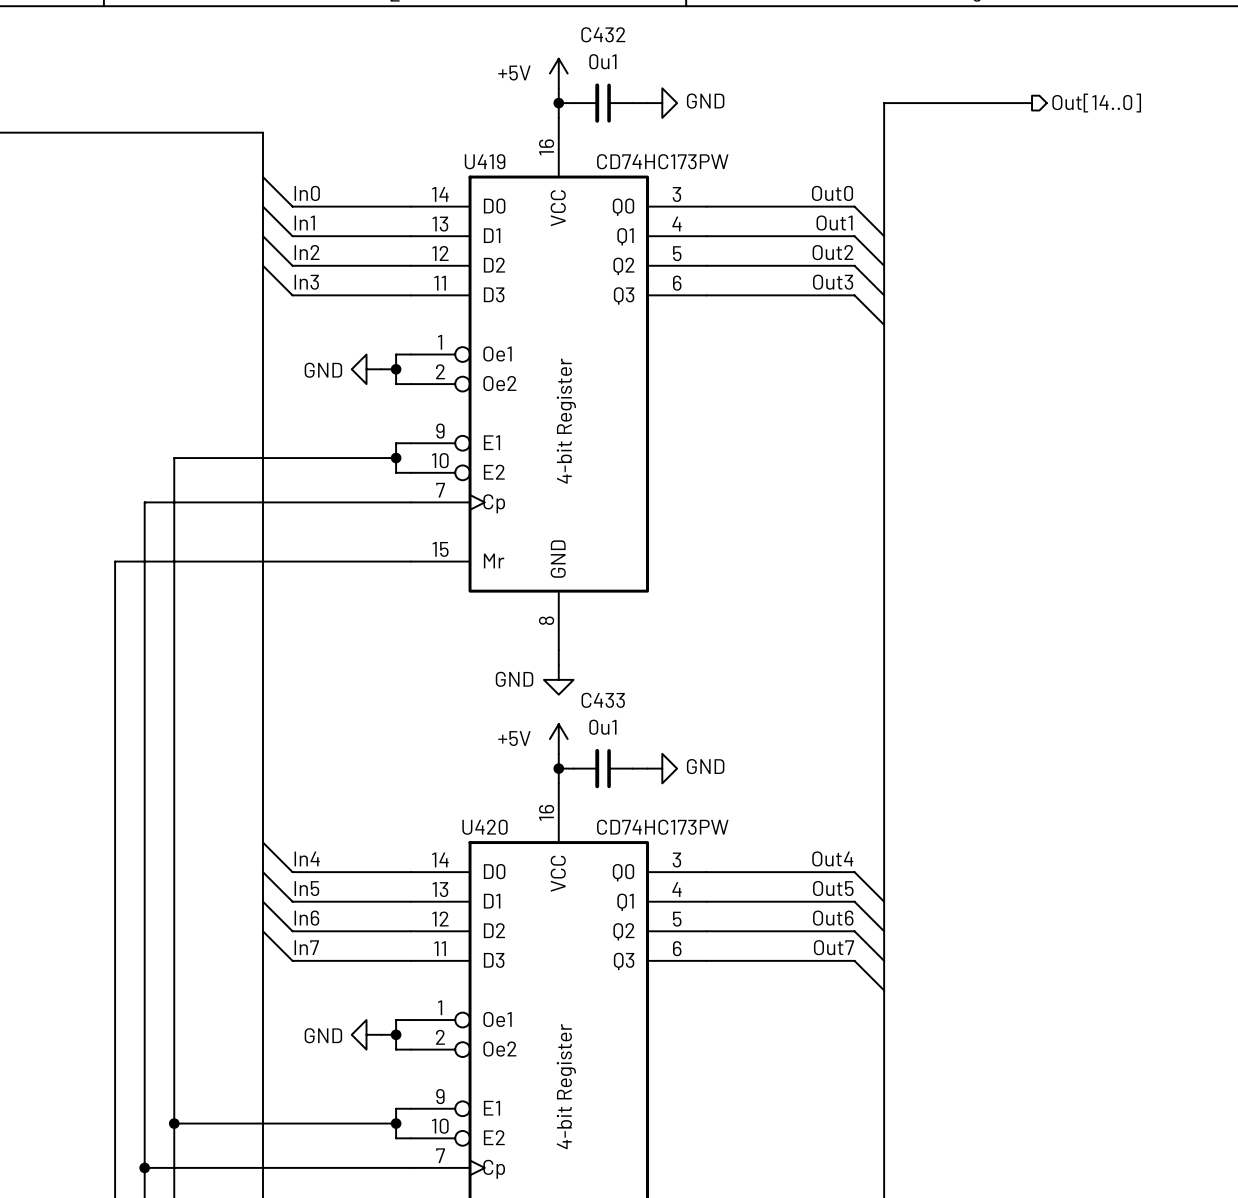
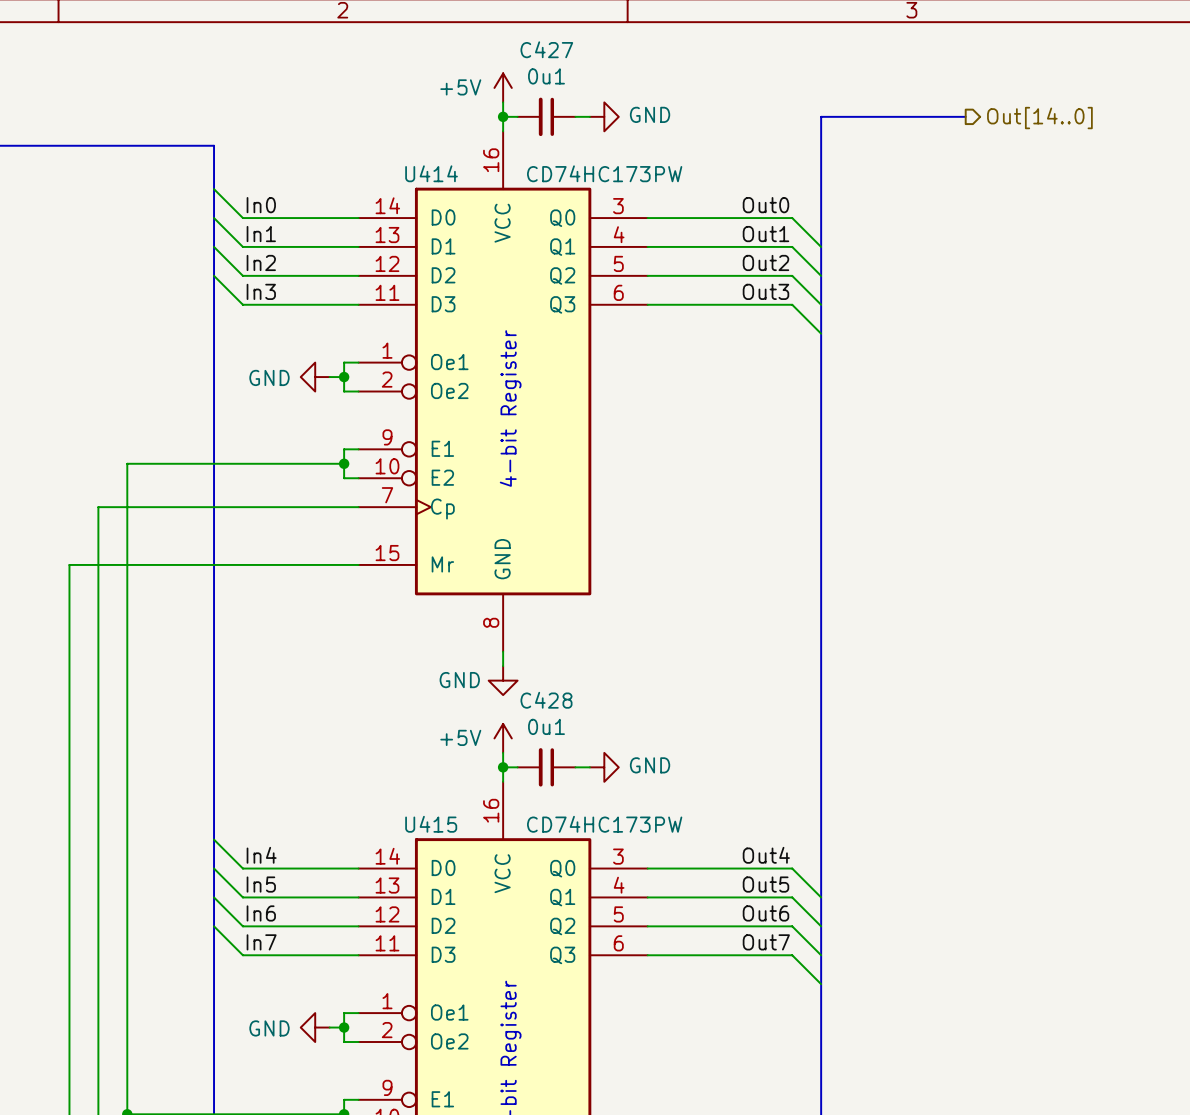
C432 name: C432 (603, 34) -> C427 (546, 49)
U419 name: U419 (485, 161) -> U414 (431, 173)
C433 name: C433 (603, 700) -> C428 (546, 700)
U420 name: U420 (484, 827) -> U415 (431, 824)

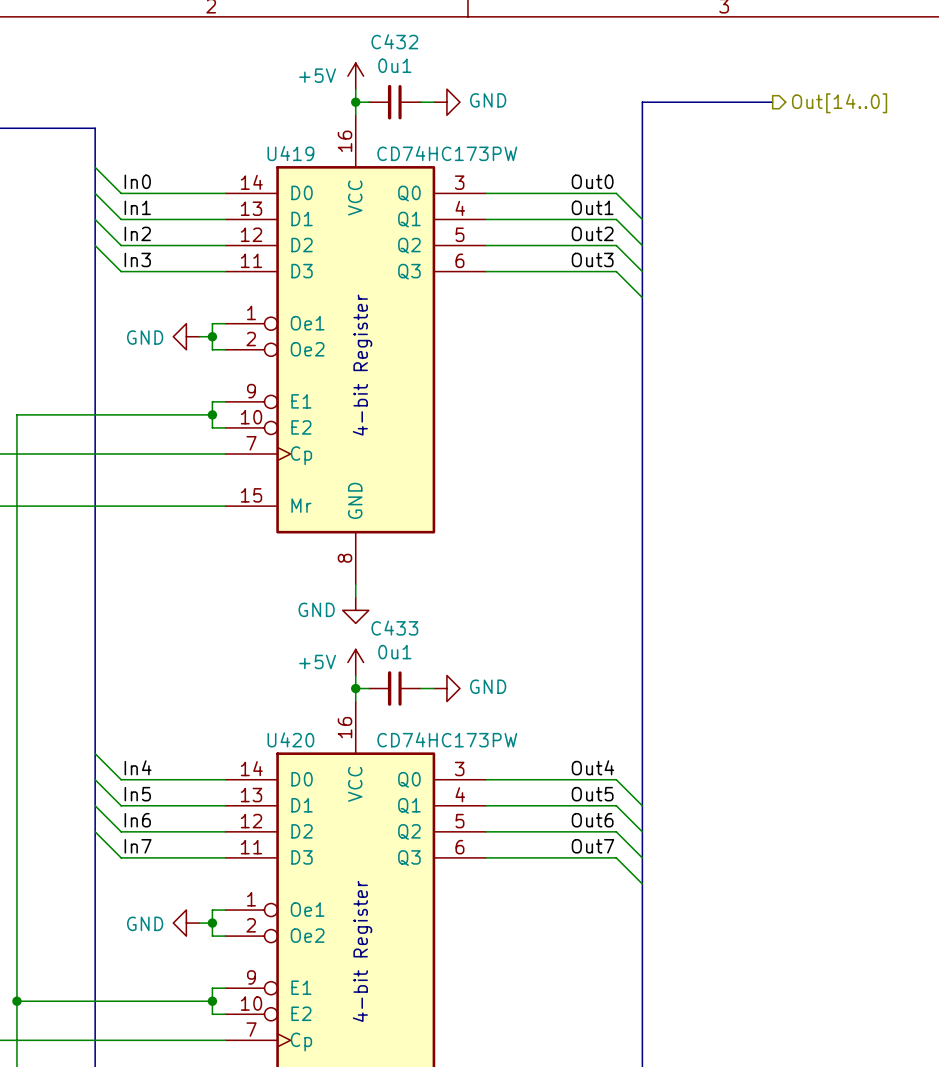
C427 name: C427 (546, 49) -> C432 (394, 41)
U414 name: U414 (431, 173) -> U419 (290, 153)
C428 name: C428 (546, 700) -> C433 (394, 628)
U415 name: U415 (431, 824) -> U420 (290, 739)

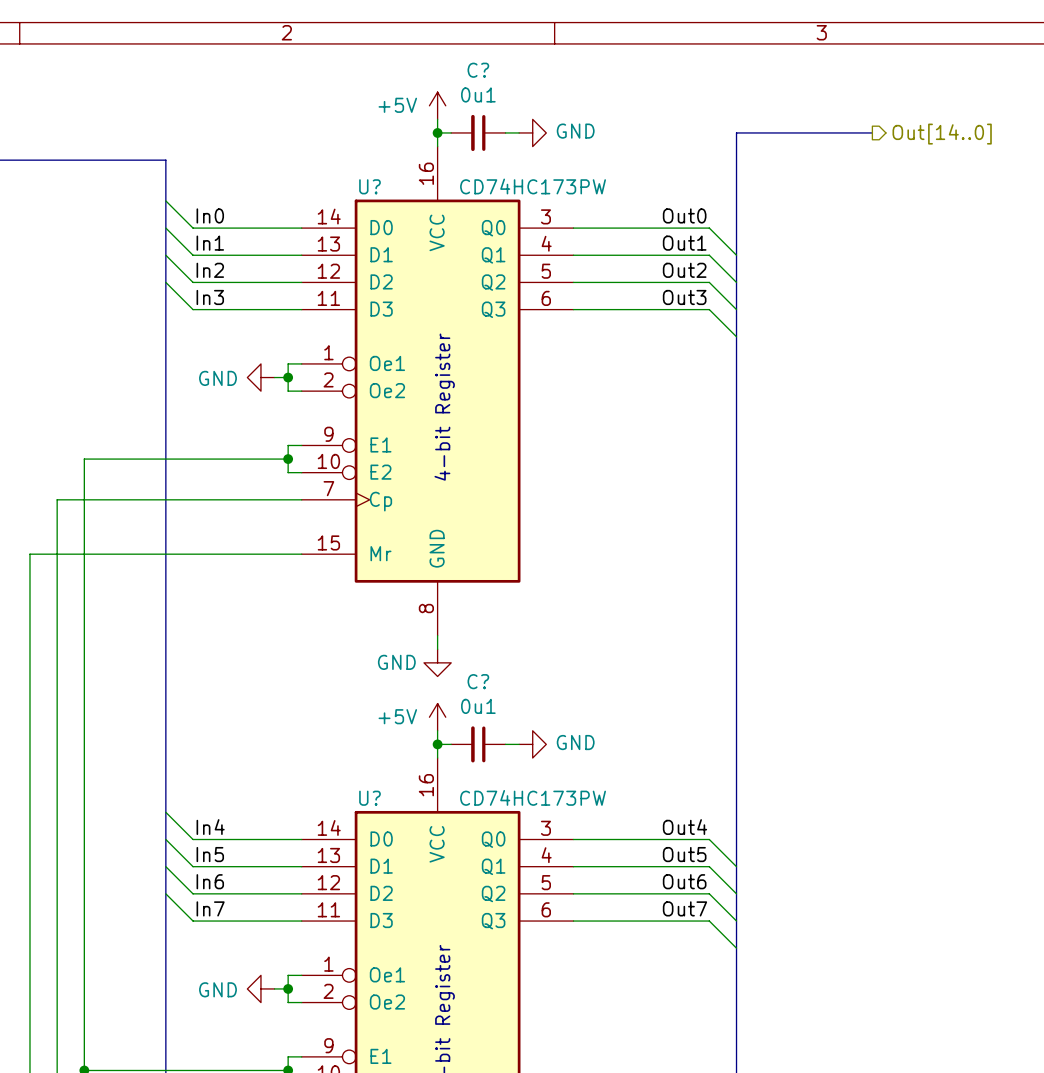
C432 name: C432 (394, 41) -> C? (478, 70)
U419 name: U419 (290, 153) -> U? (369, 186)
C433 name: C433 (394, 628) -> C? (478, 681)
U420 name: U420 (290, 739) -> U? (369, 798)

